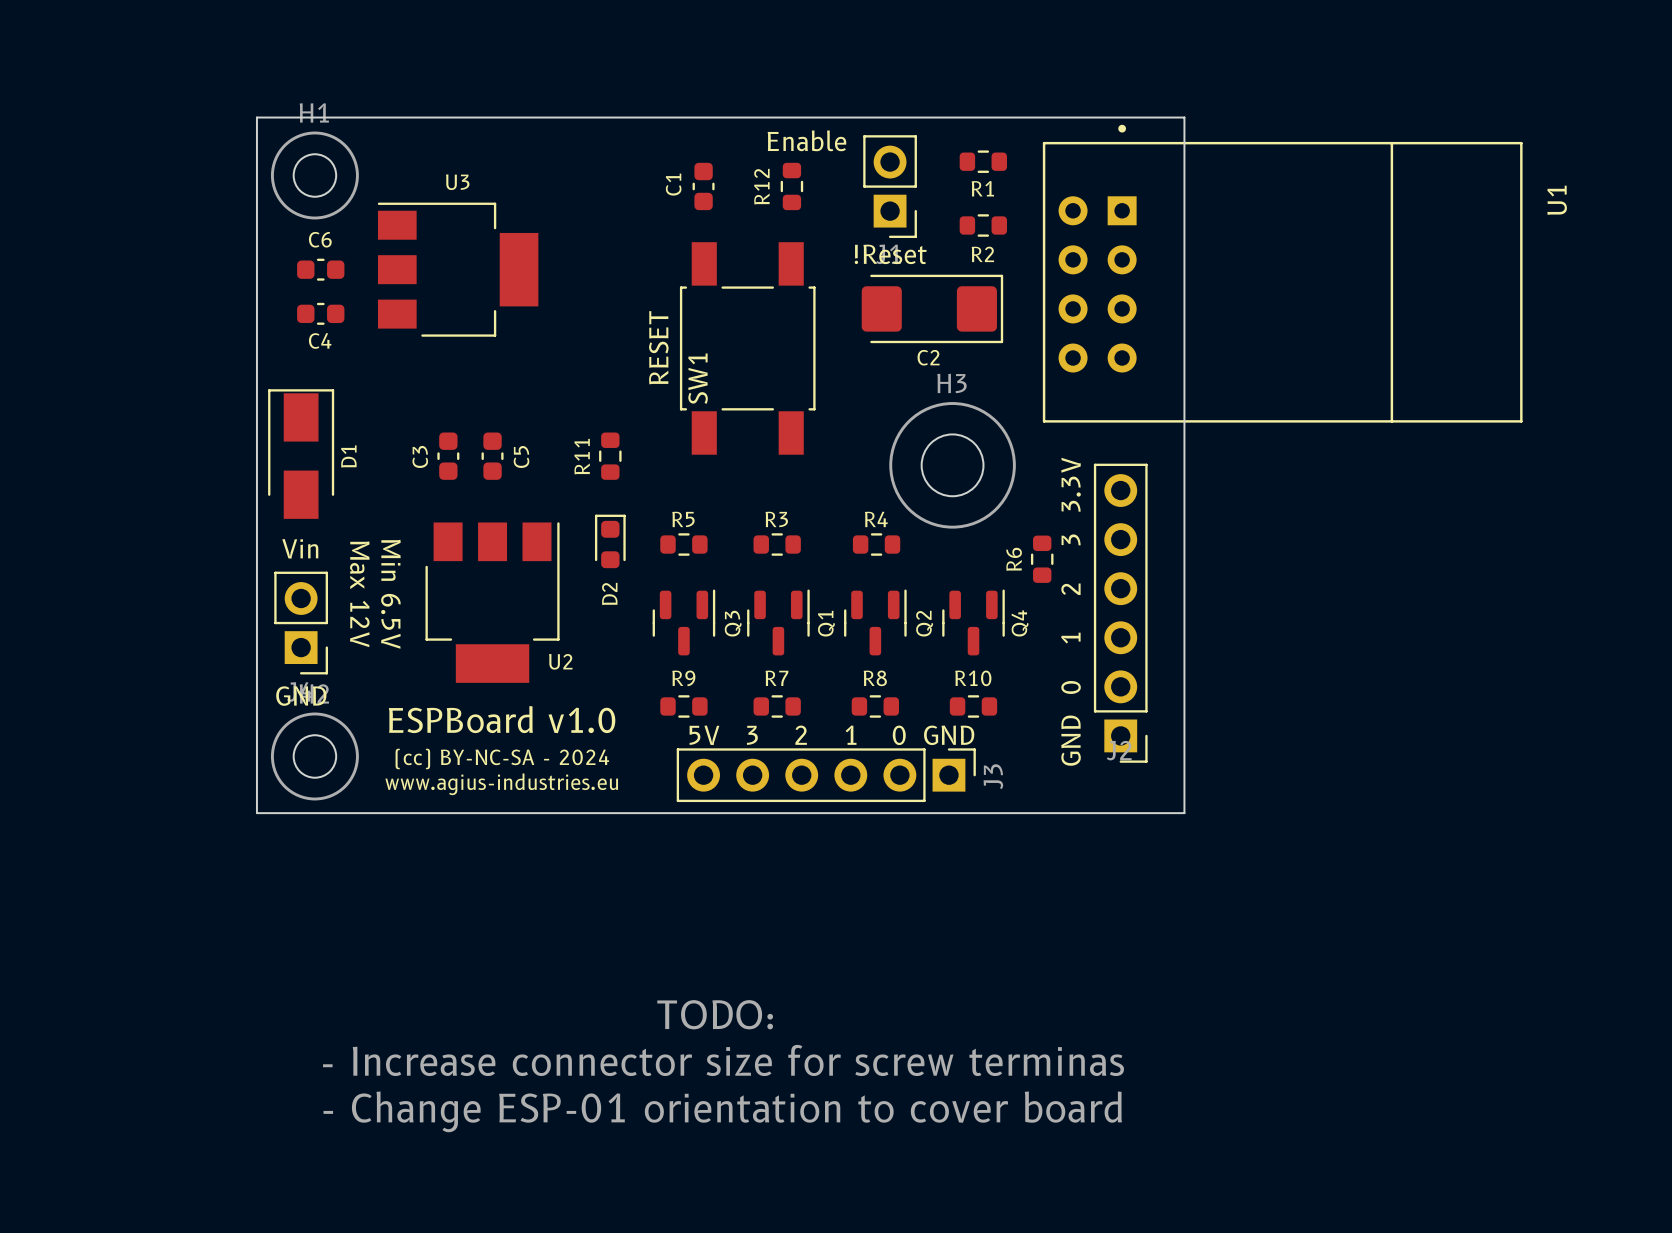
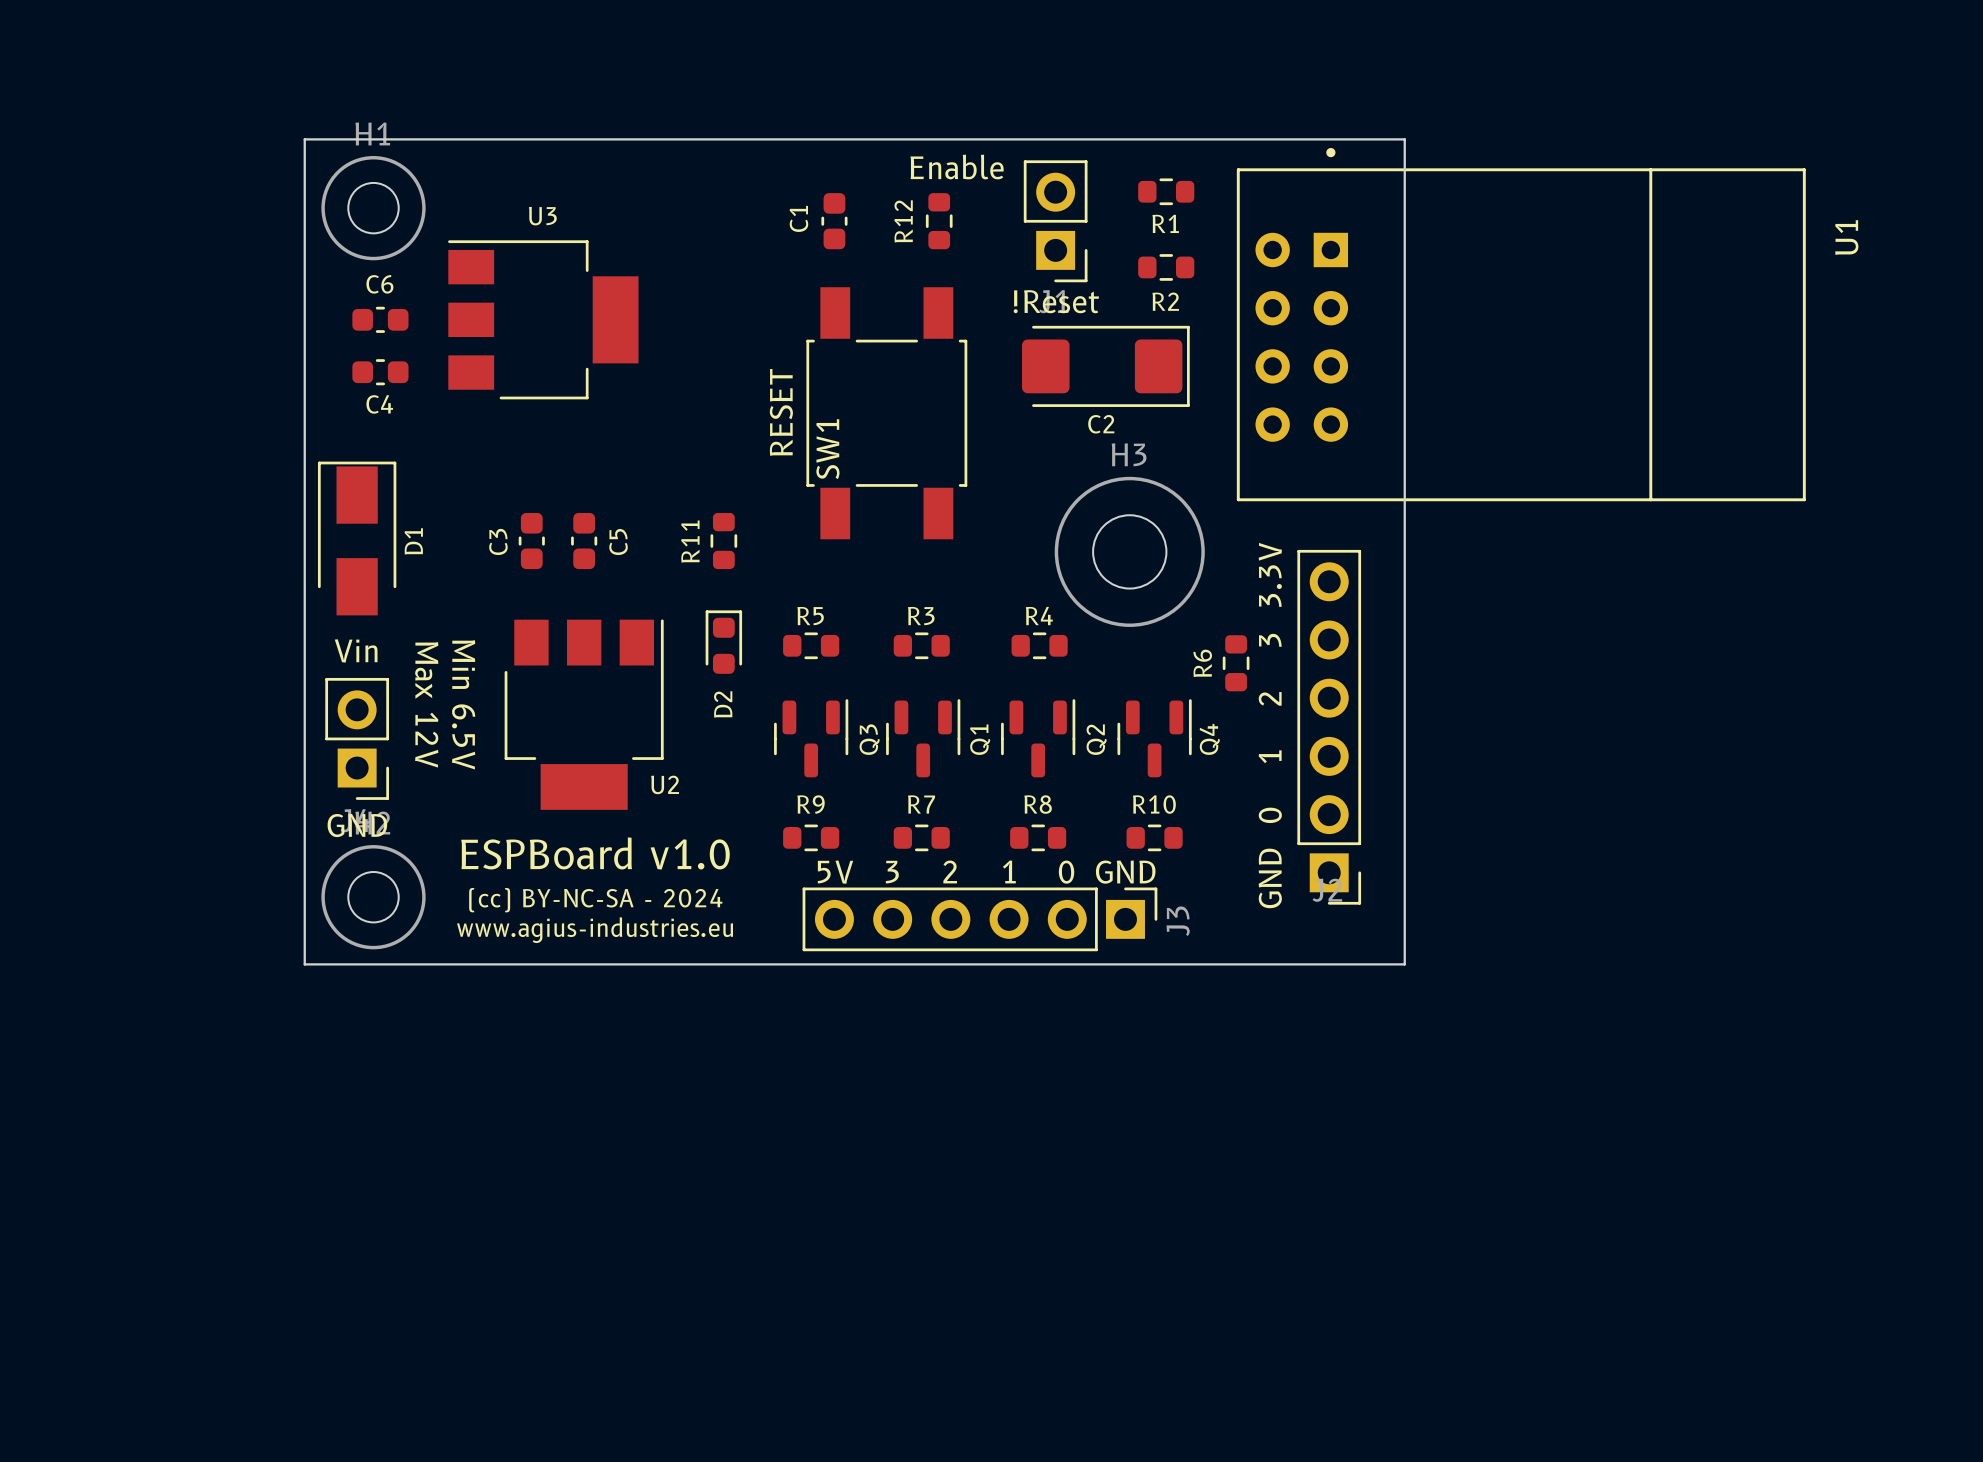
text: TODO: (715, 1014) -> none
text: - Increase connector size for screw terminas (723, 1060) -> none
text: - Change ESP-01 orientation to cover board (722, 1111) -> none

